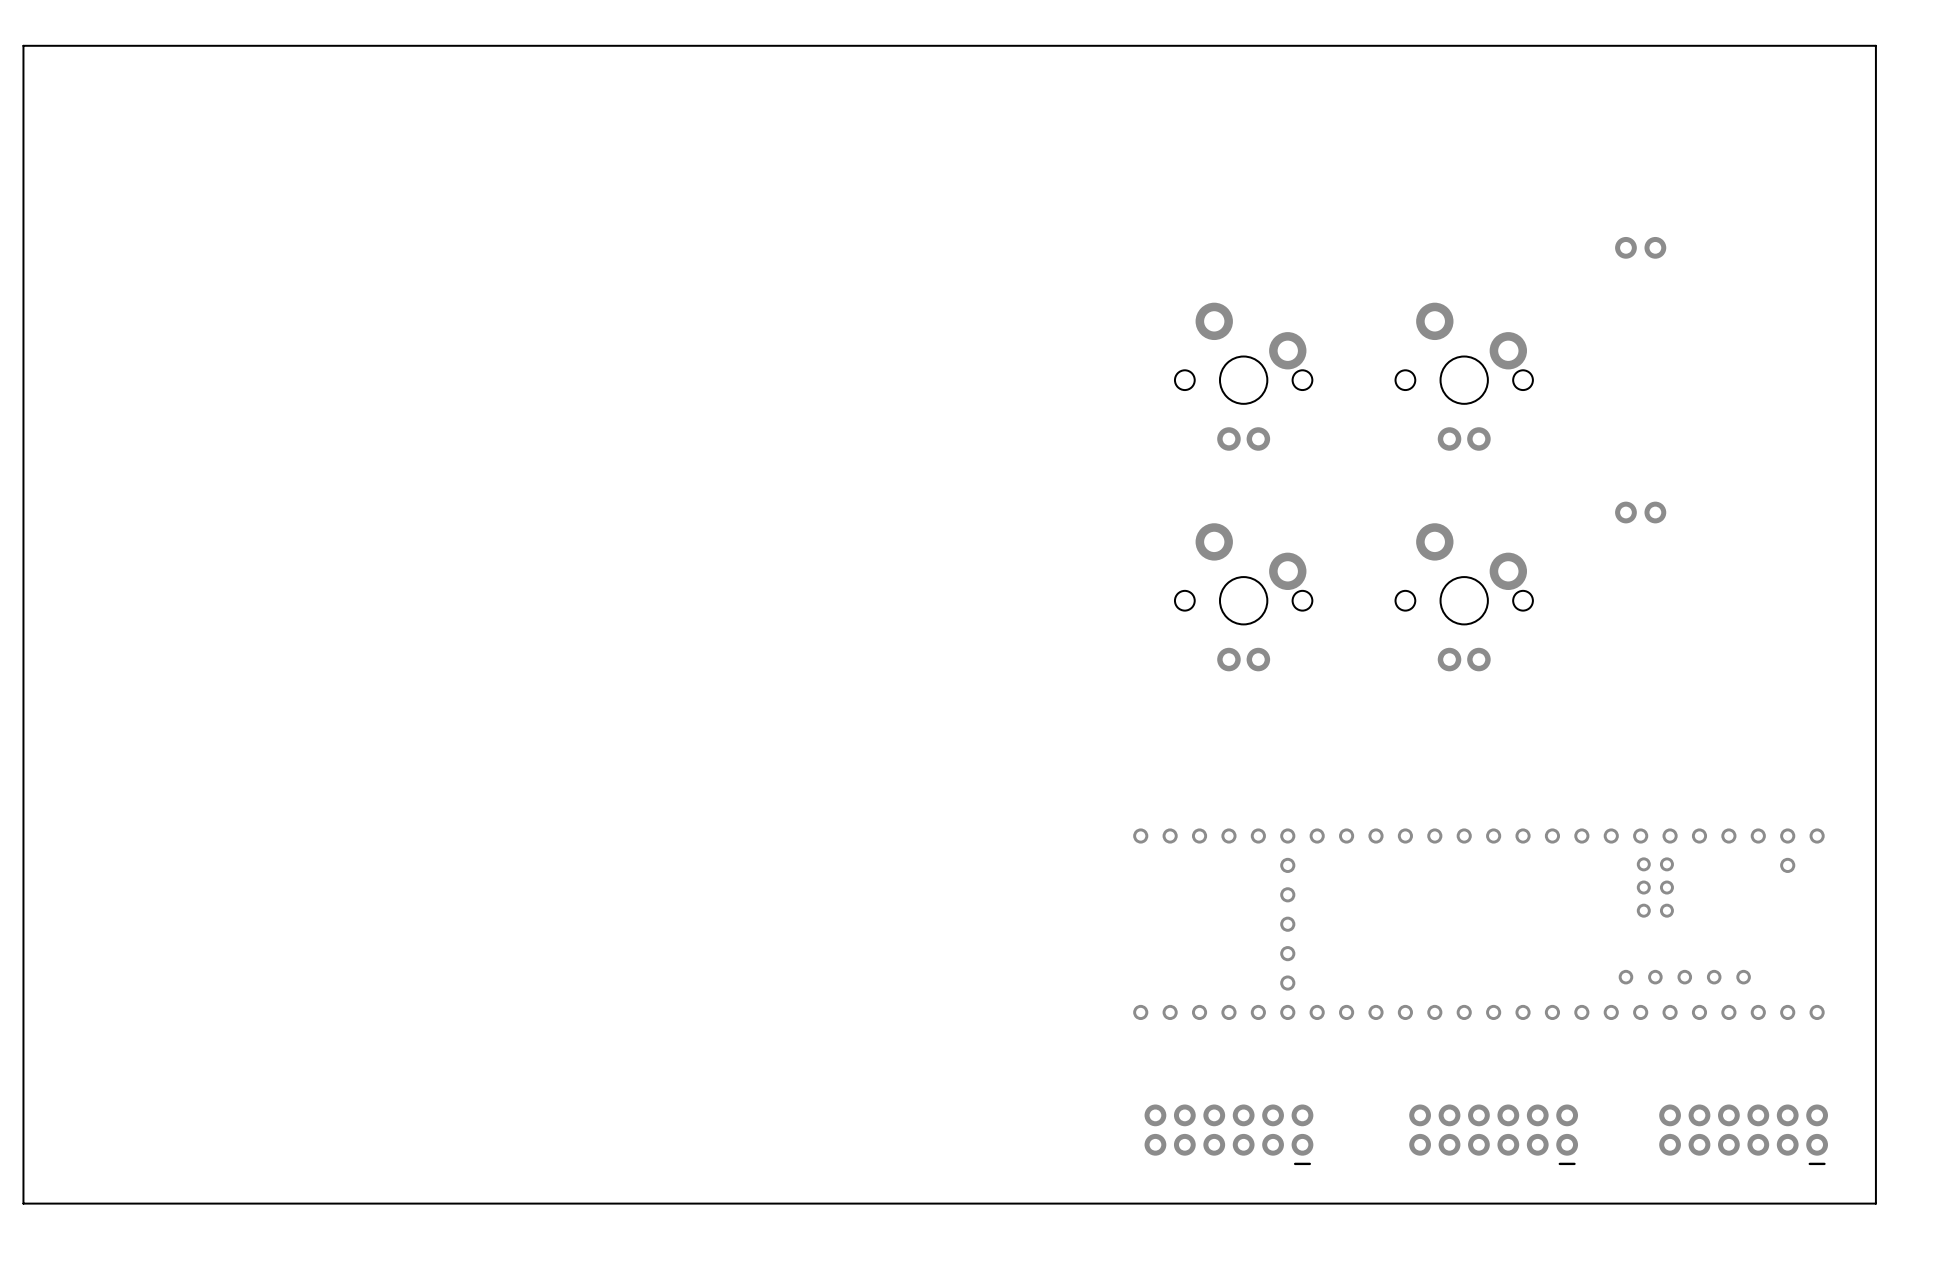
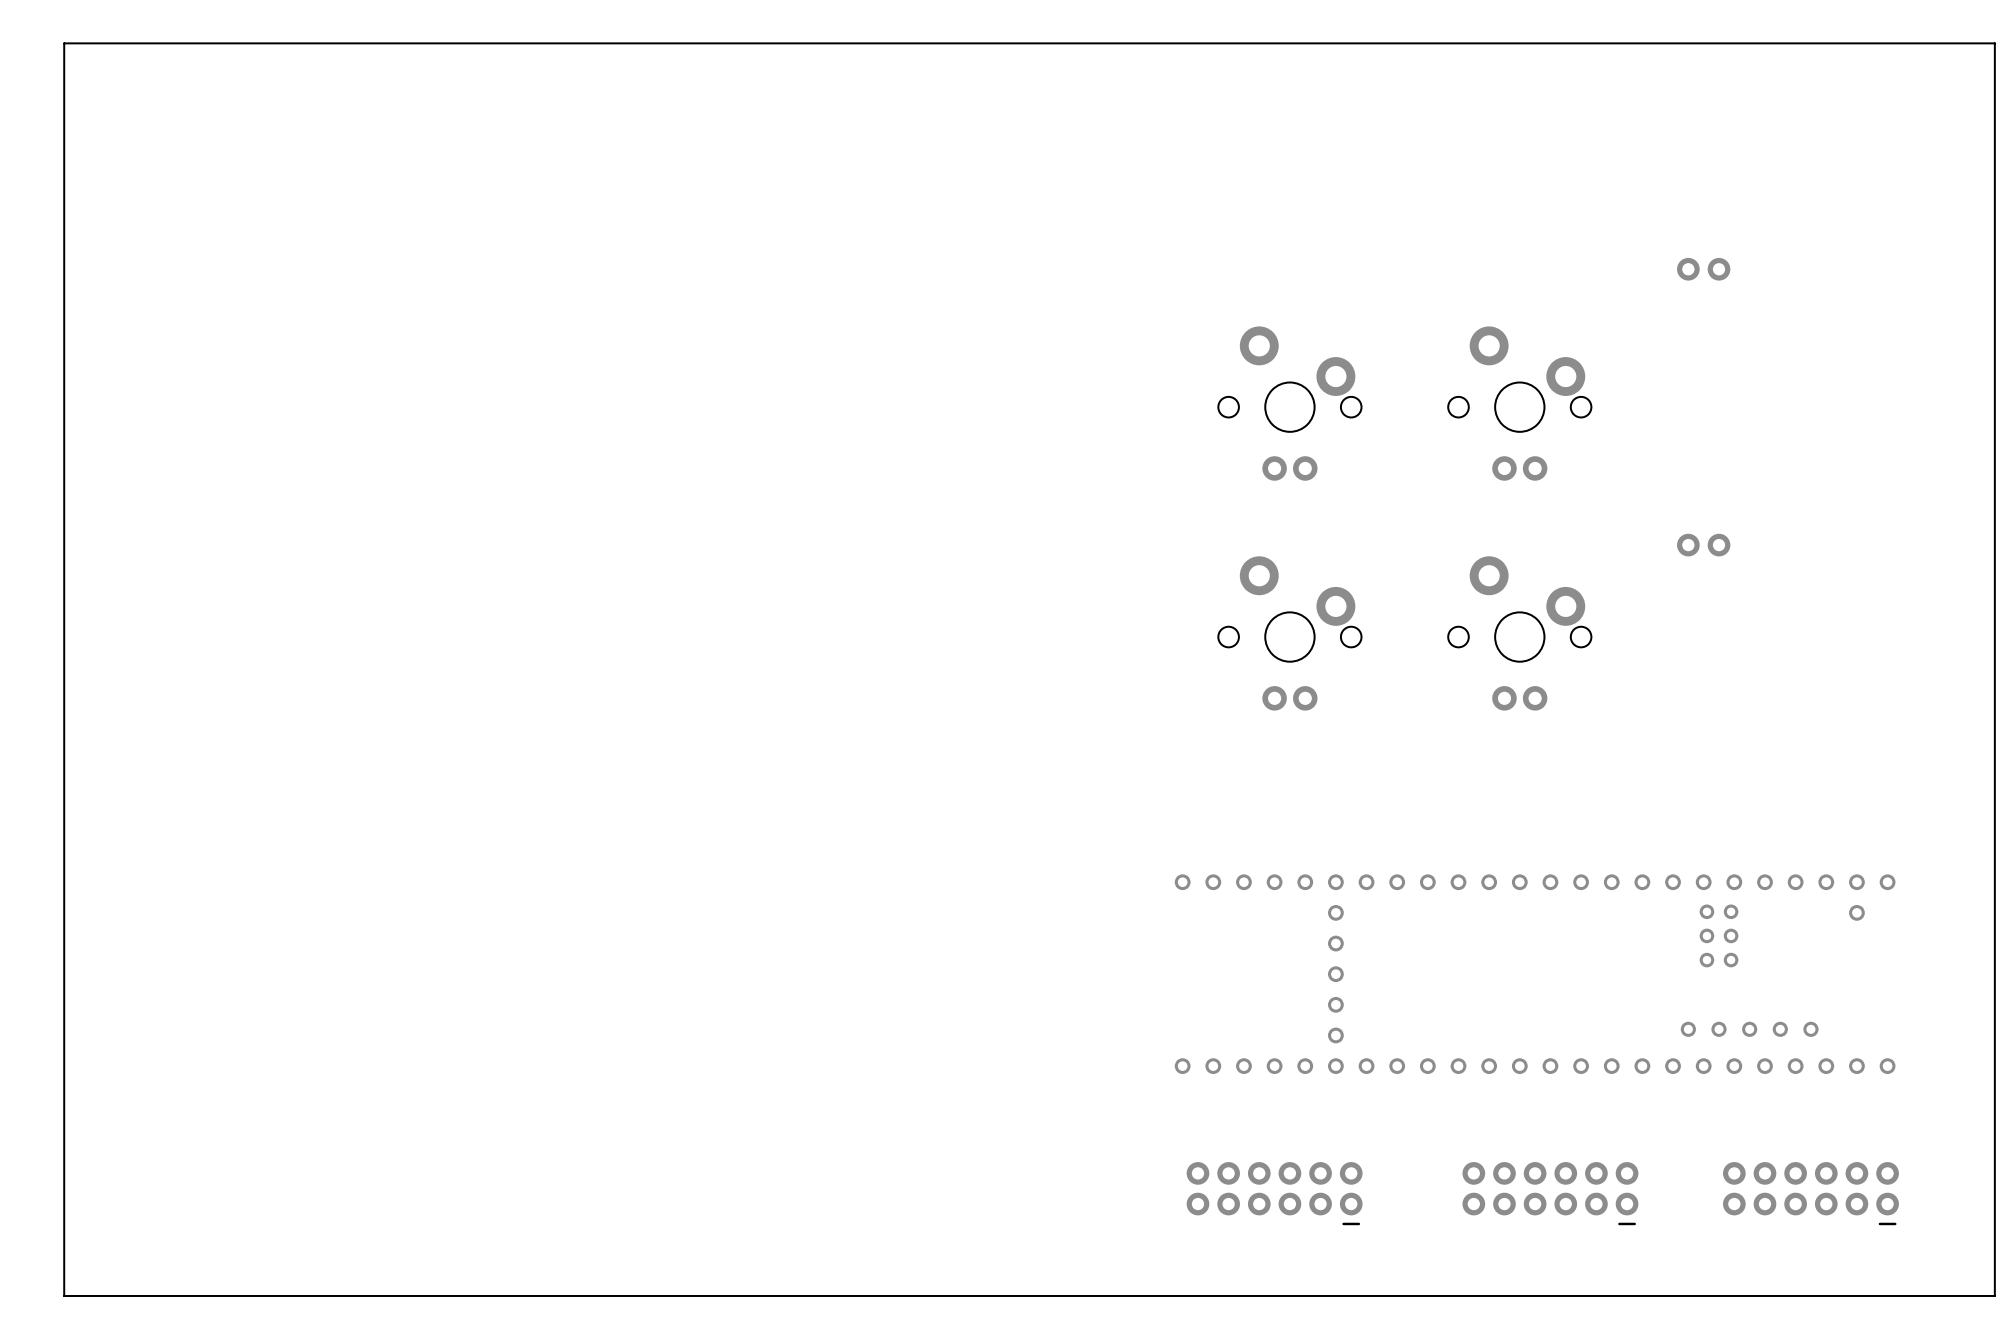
board edge: (1875, 45) (23, 45) (23, 1203) (1875, 1203) (1875, 45) -> (1994, 43) (1994, 1295) (64, 1295) (64, 43) (1994, 43)

